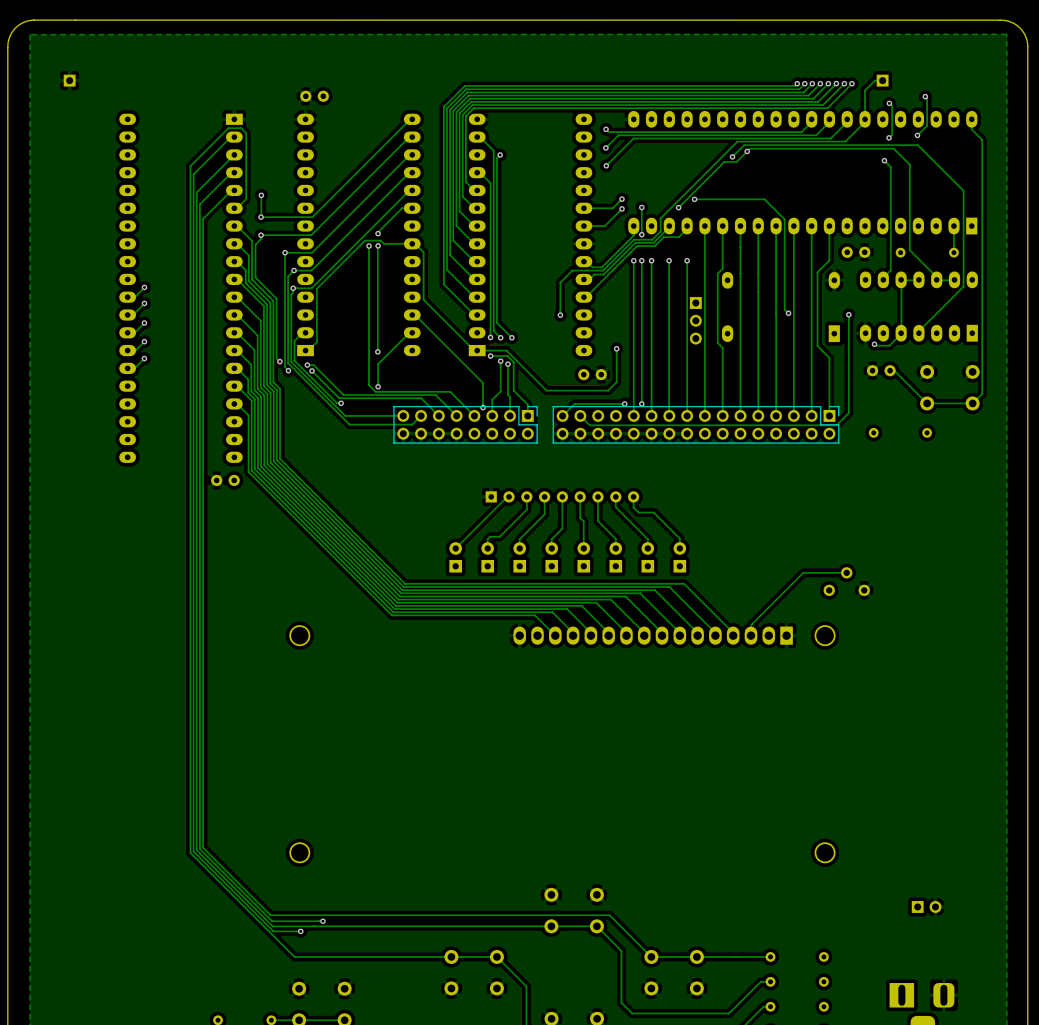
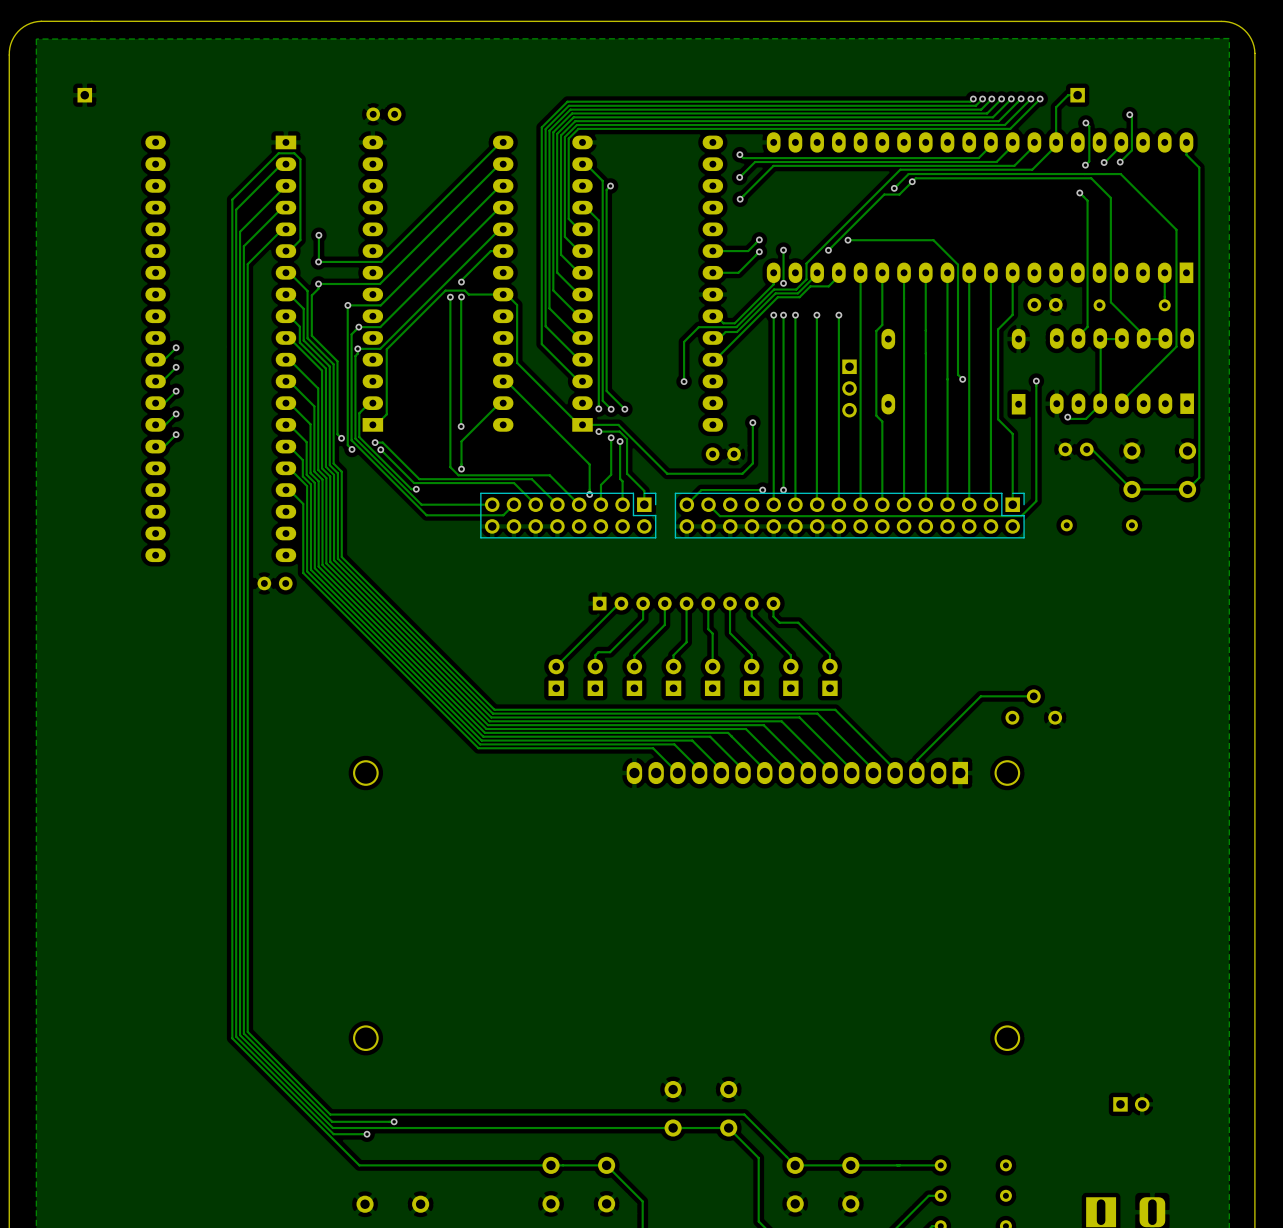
track: none -> (1121, 145) (1104, 162)
via: none -> (1104, 162)

